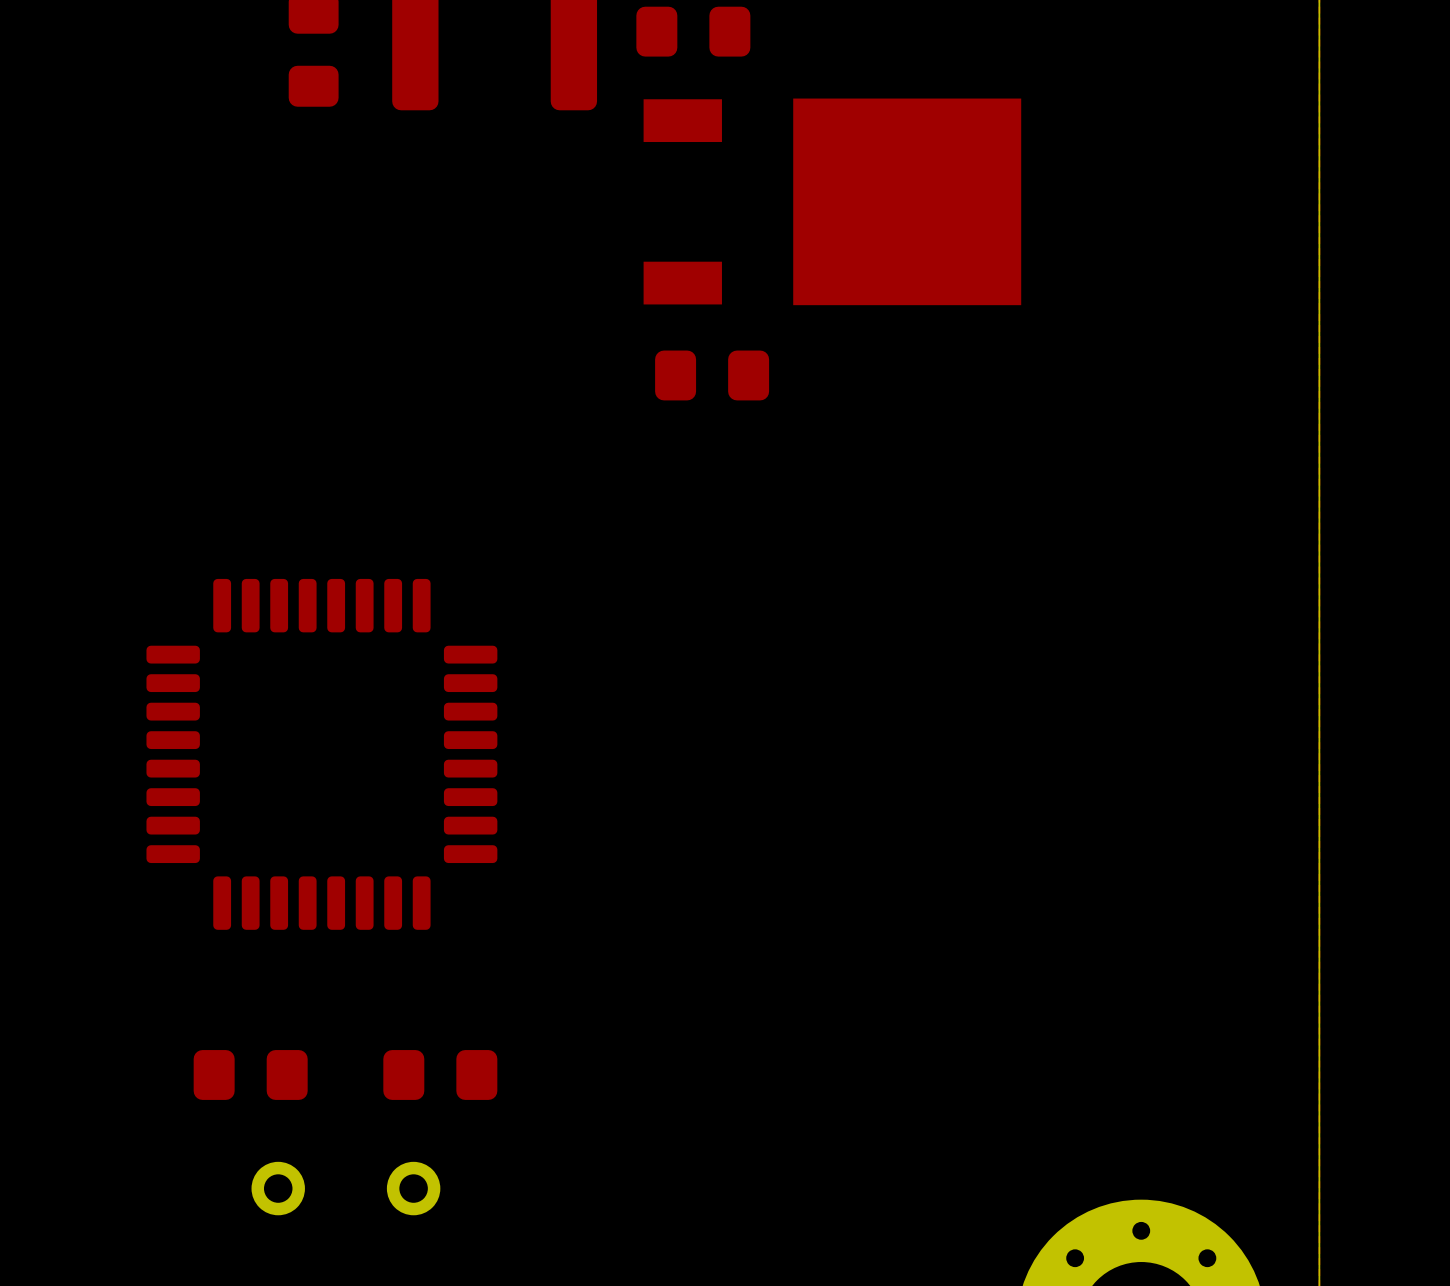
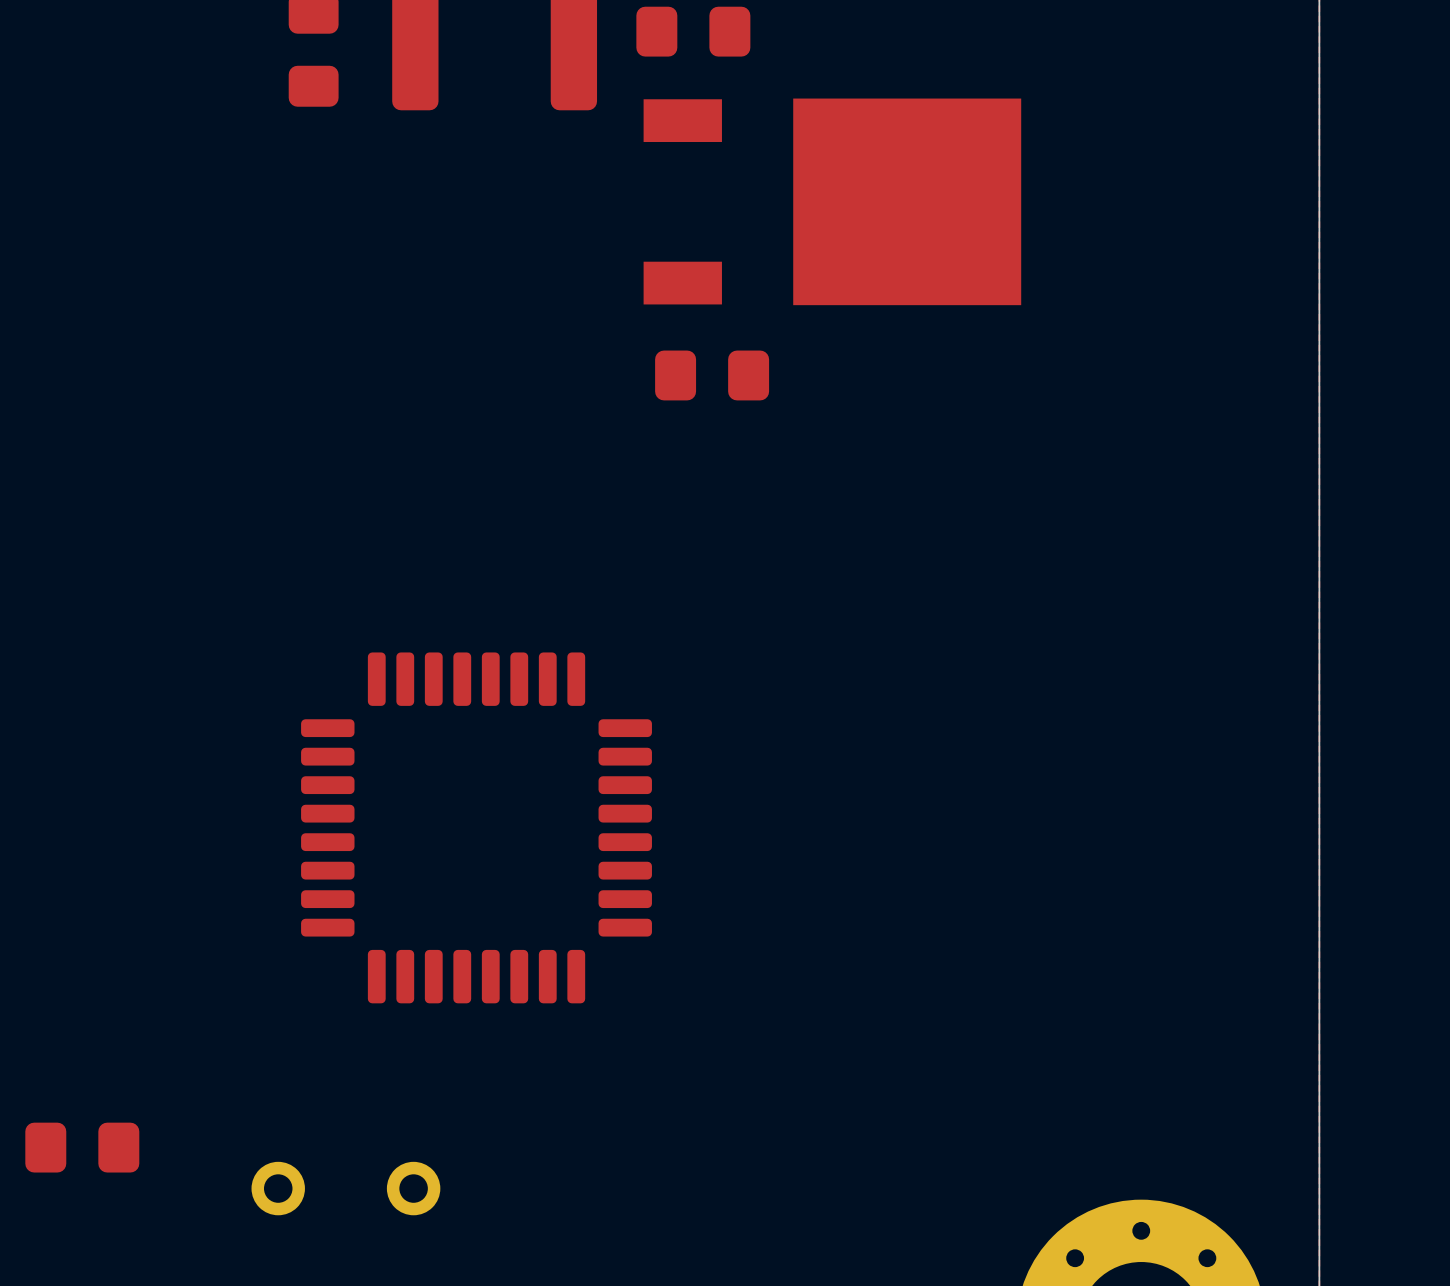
part position: (321, 754) -> (476, 827)
part: (250, 1074) -> none
part: (440, 1074) -> none
part: none -> (82, 1147)

